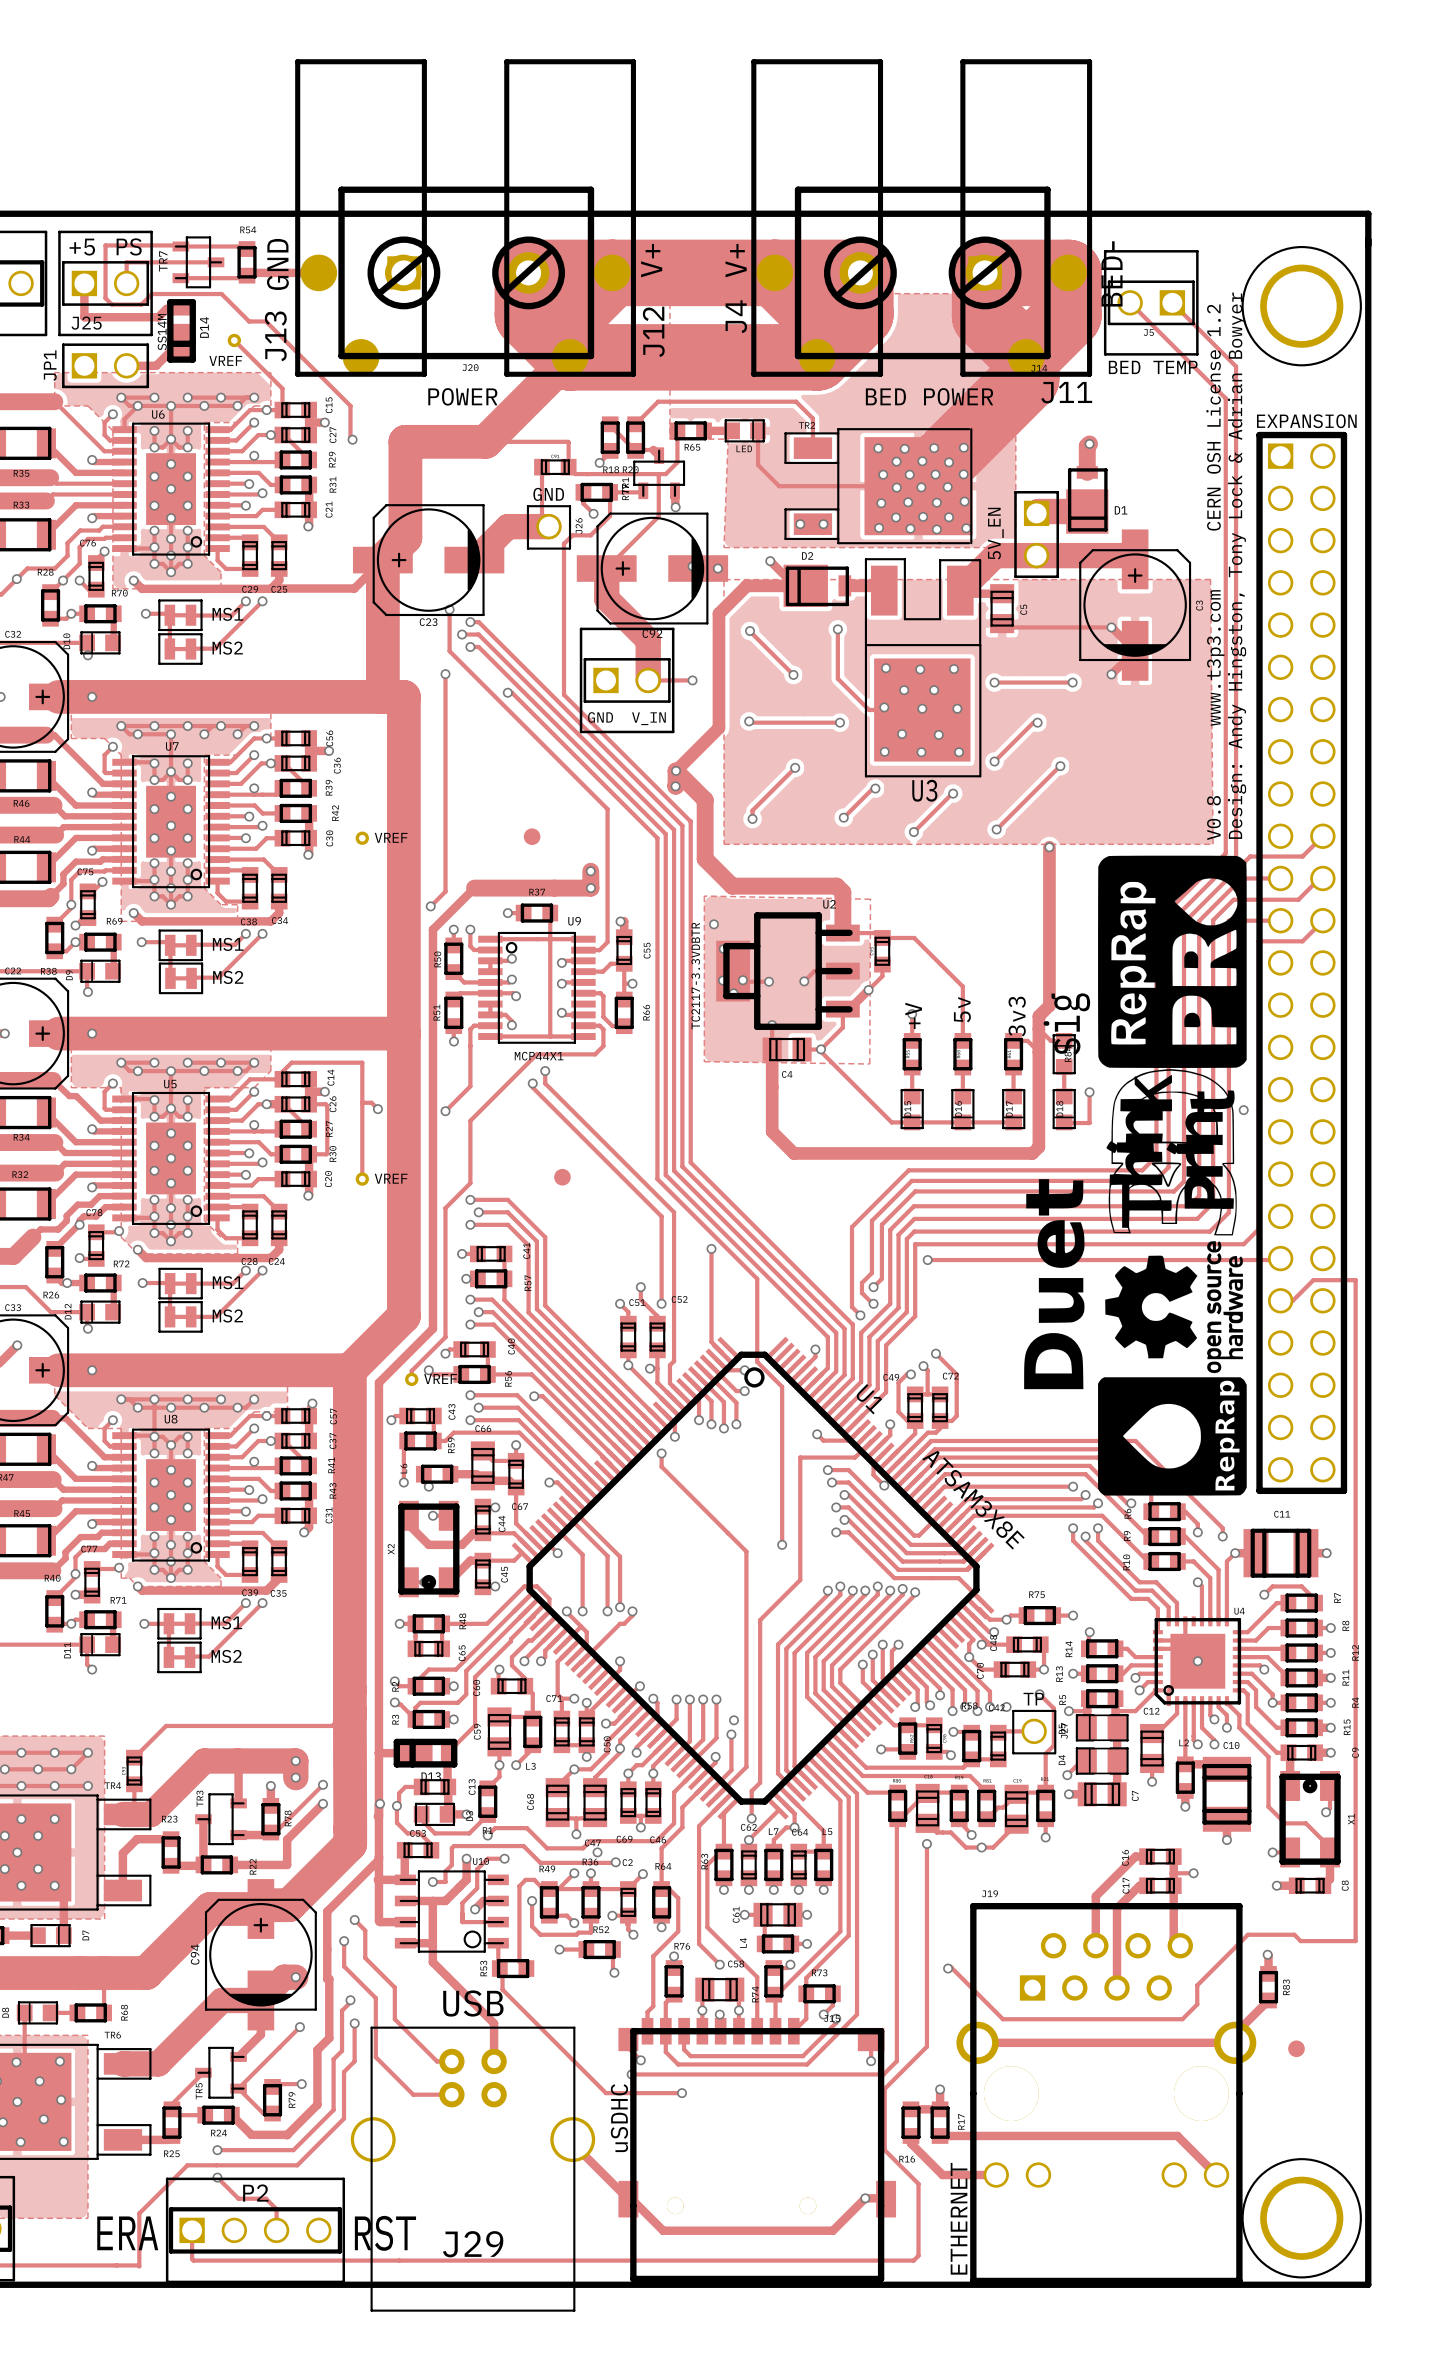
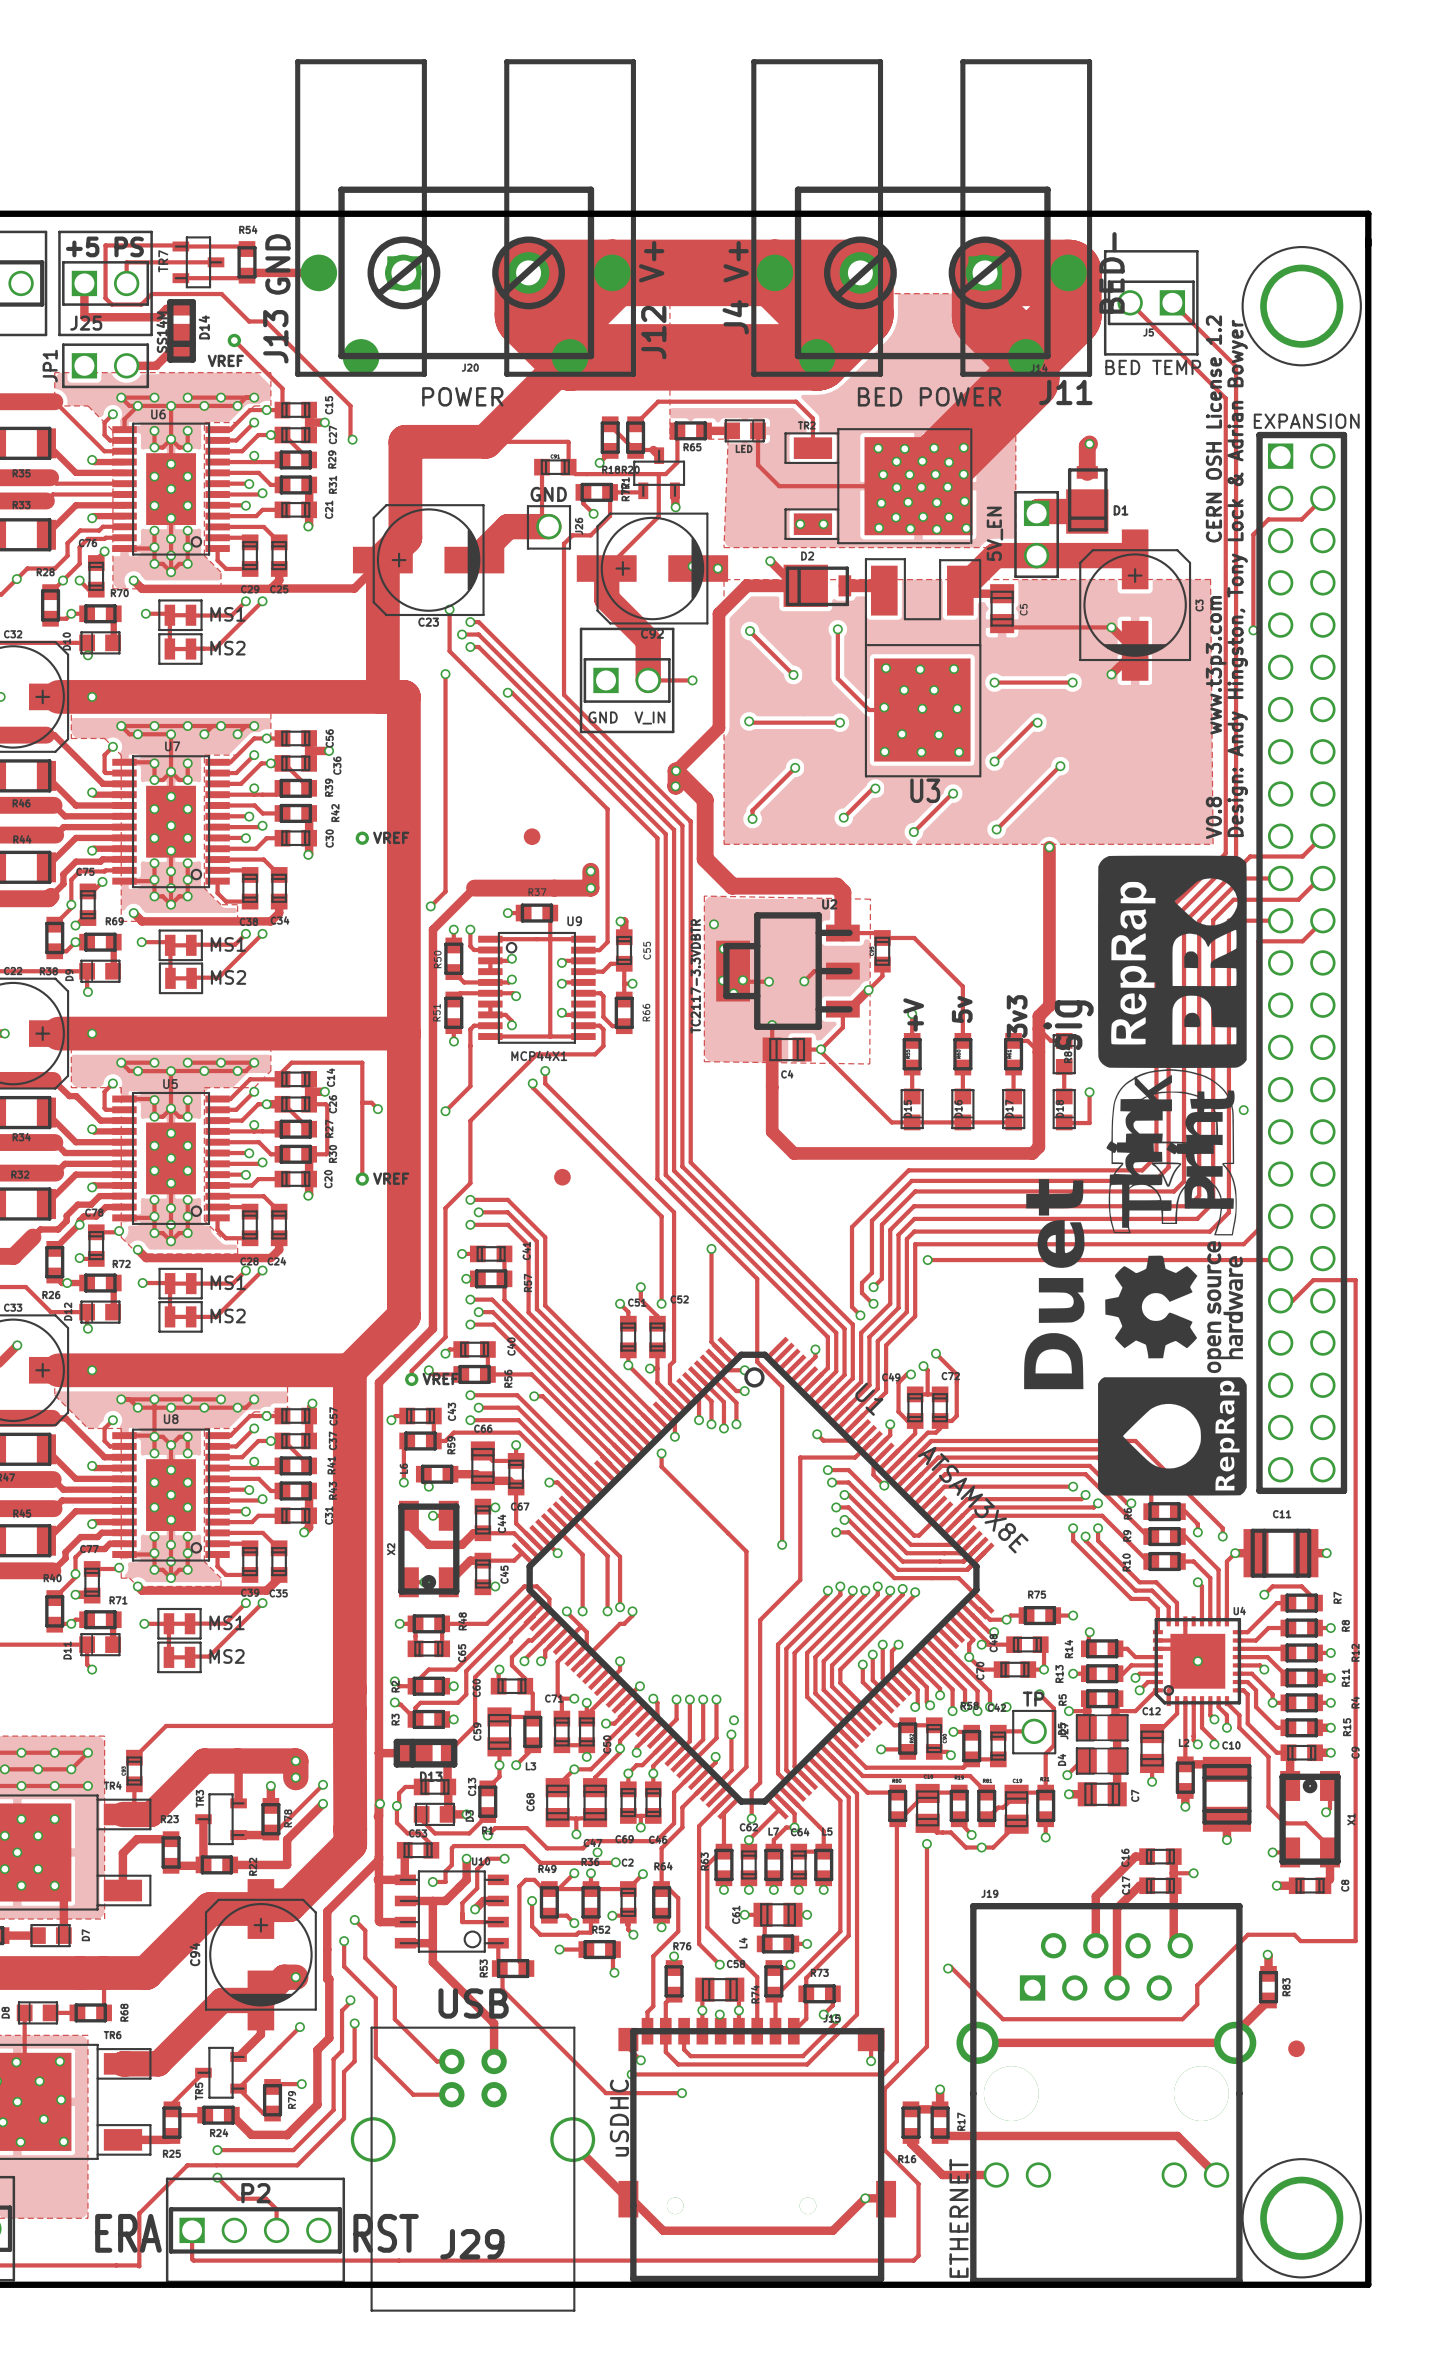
track: none -> (1322, 498) (1301, 519) (1268, 519) (1253, 534) (1253, 630)
via: none -> (1253, 630)

